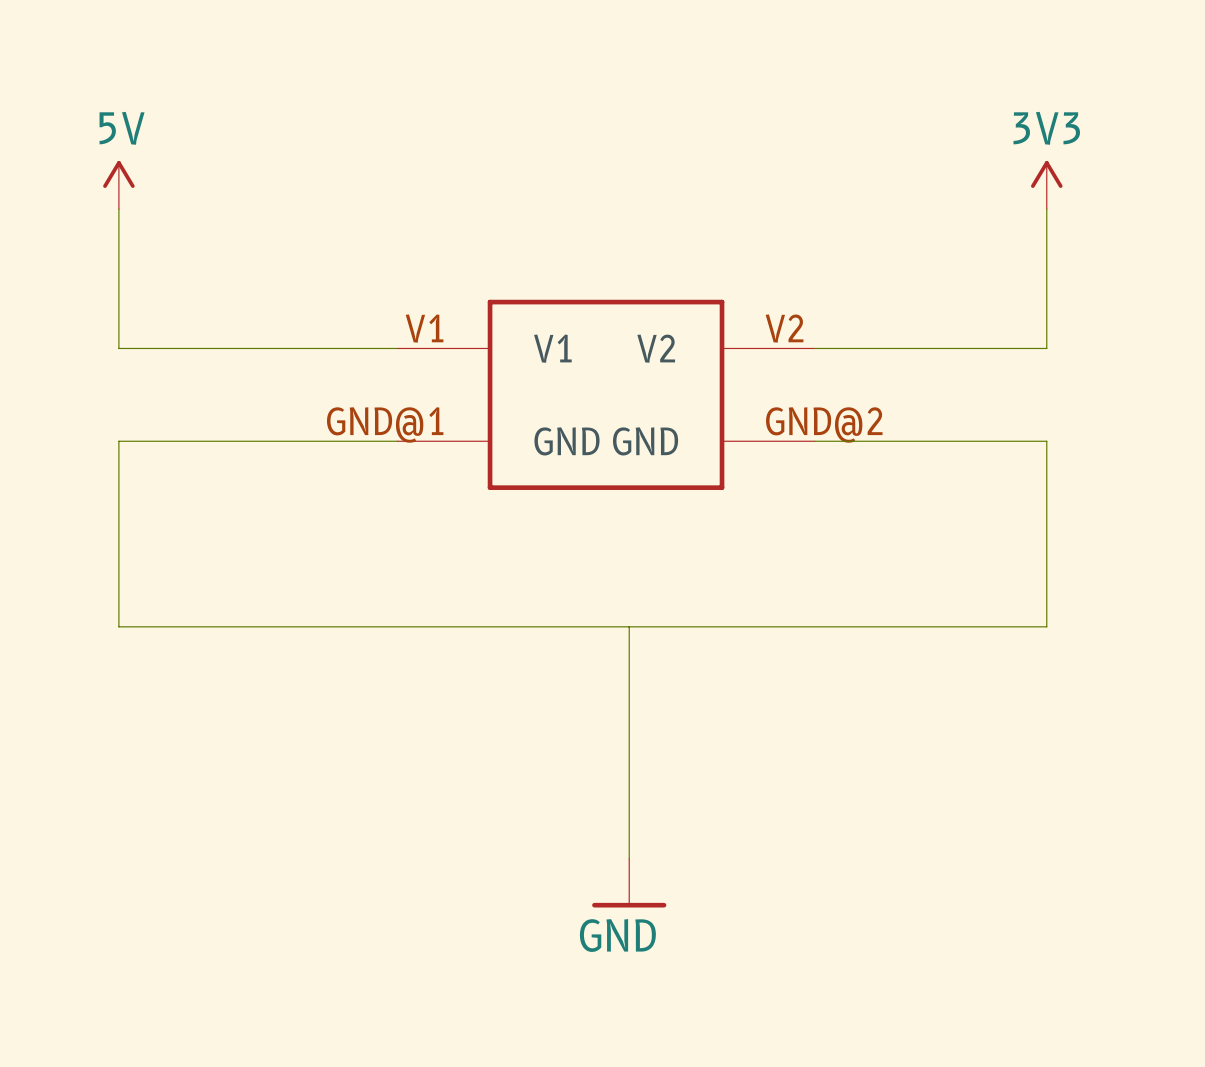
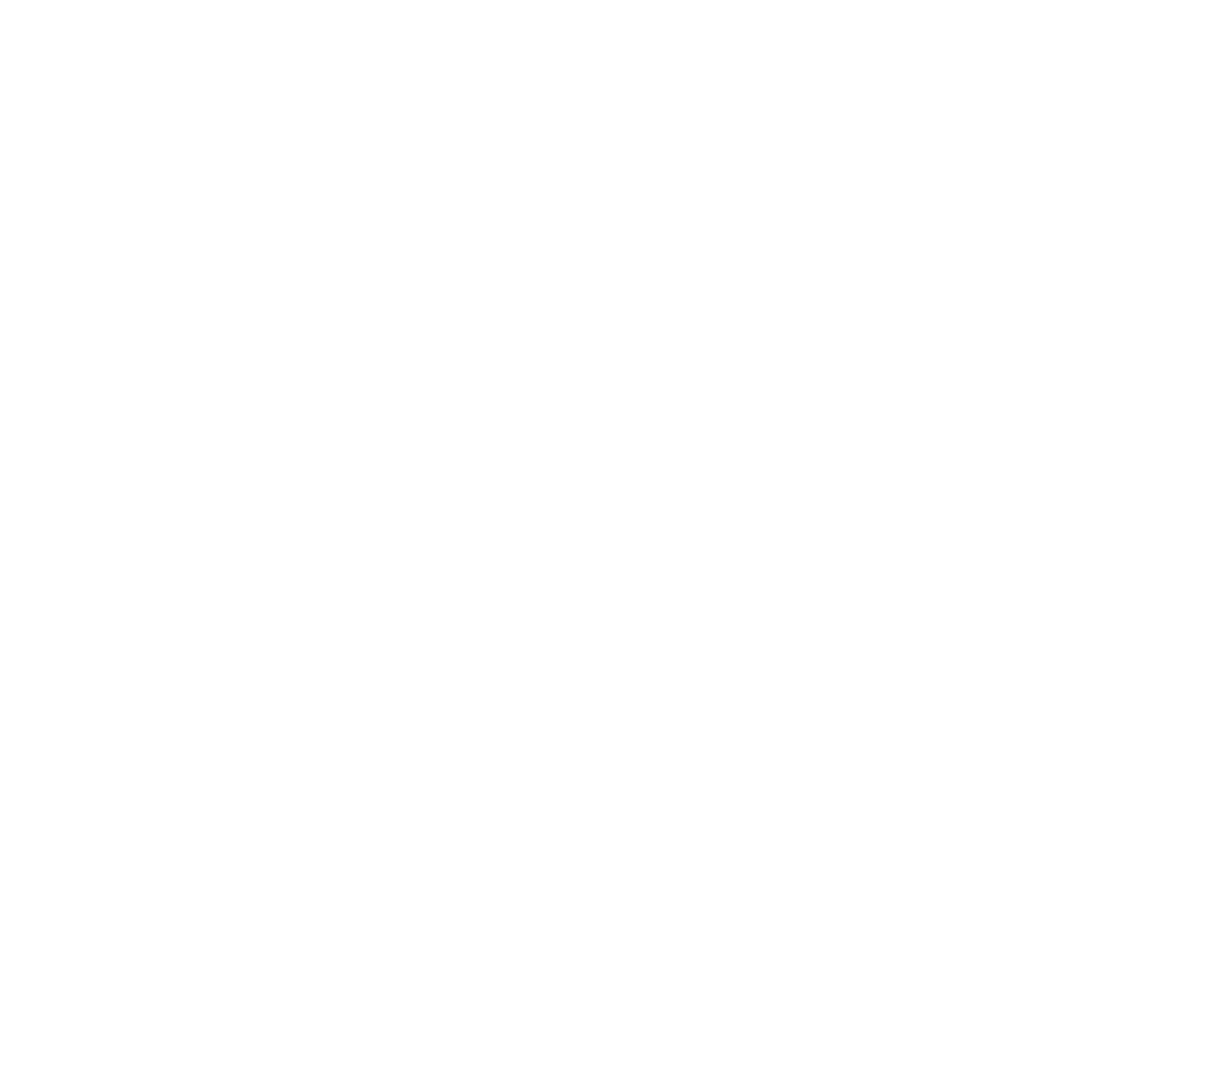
power symbol: 5V (118, 185) -> none
power symbol: 3V3 (1046, 185) -> none
wire: (118, 209) (118, 348) (397, 348) -> none
wire: (1046, 209) (1046, 348) (814, 348) -> none
part: (606, 394) -> none
wire: (397, 441) (118, 441) (118, 626) (1046, 626) (1046, 441) (814, 441) -> none
wire: (629, 626) (629, 858) -> none
power symbol: GND (629, 883) -> none

